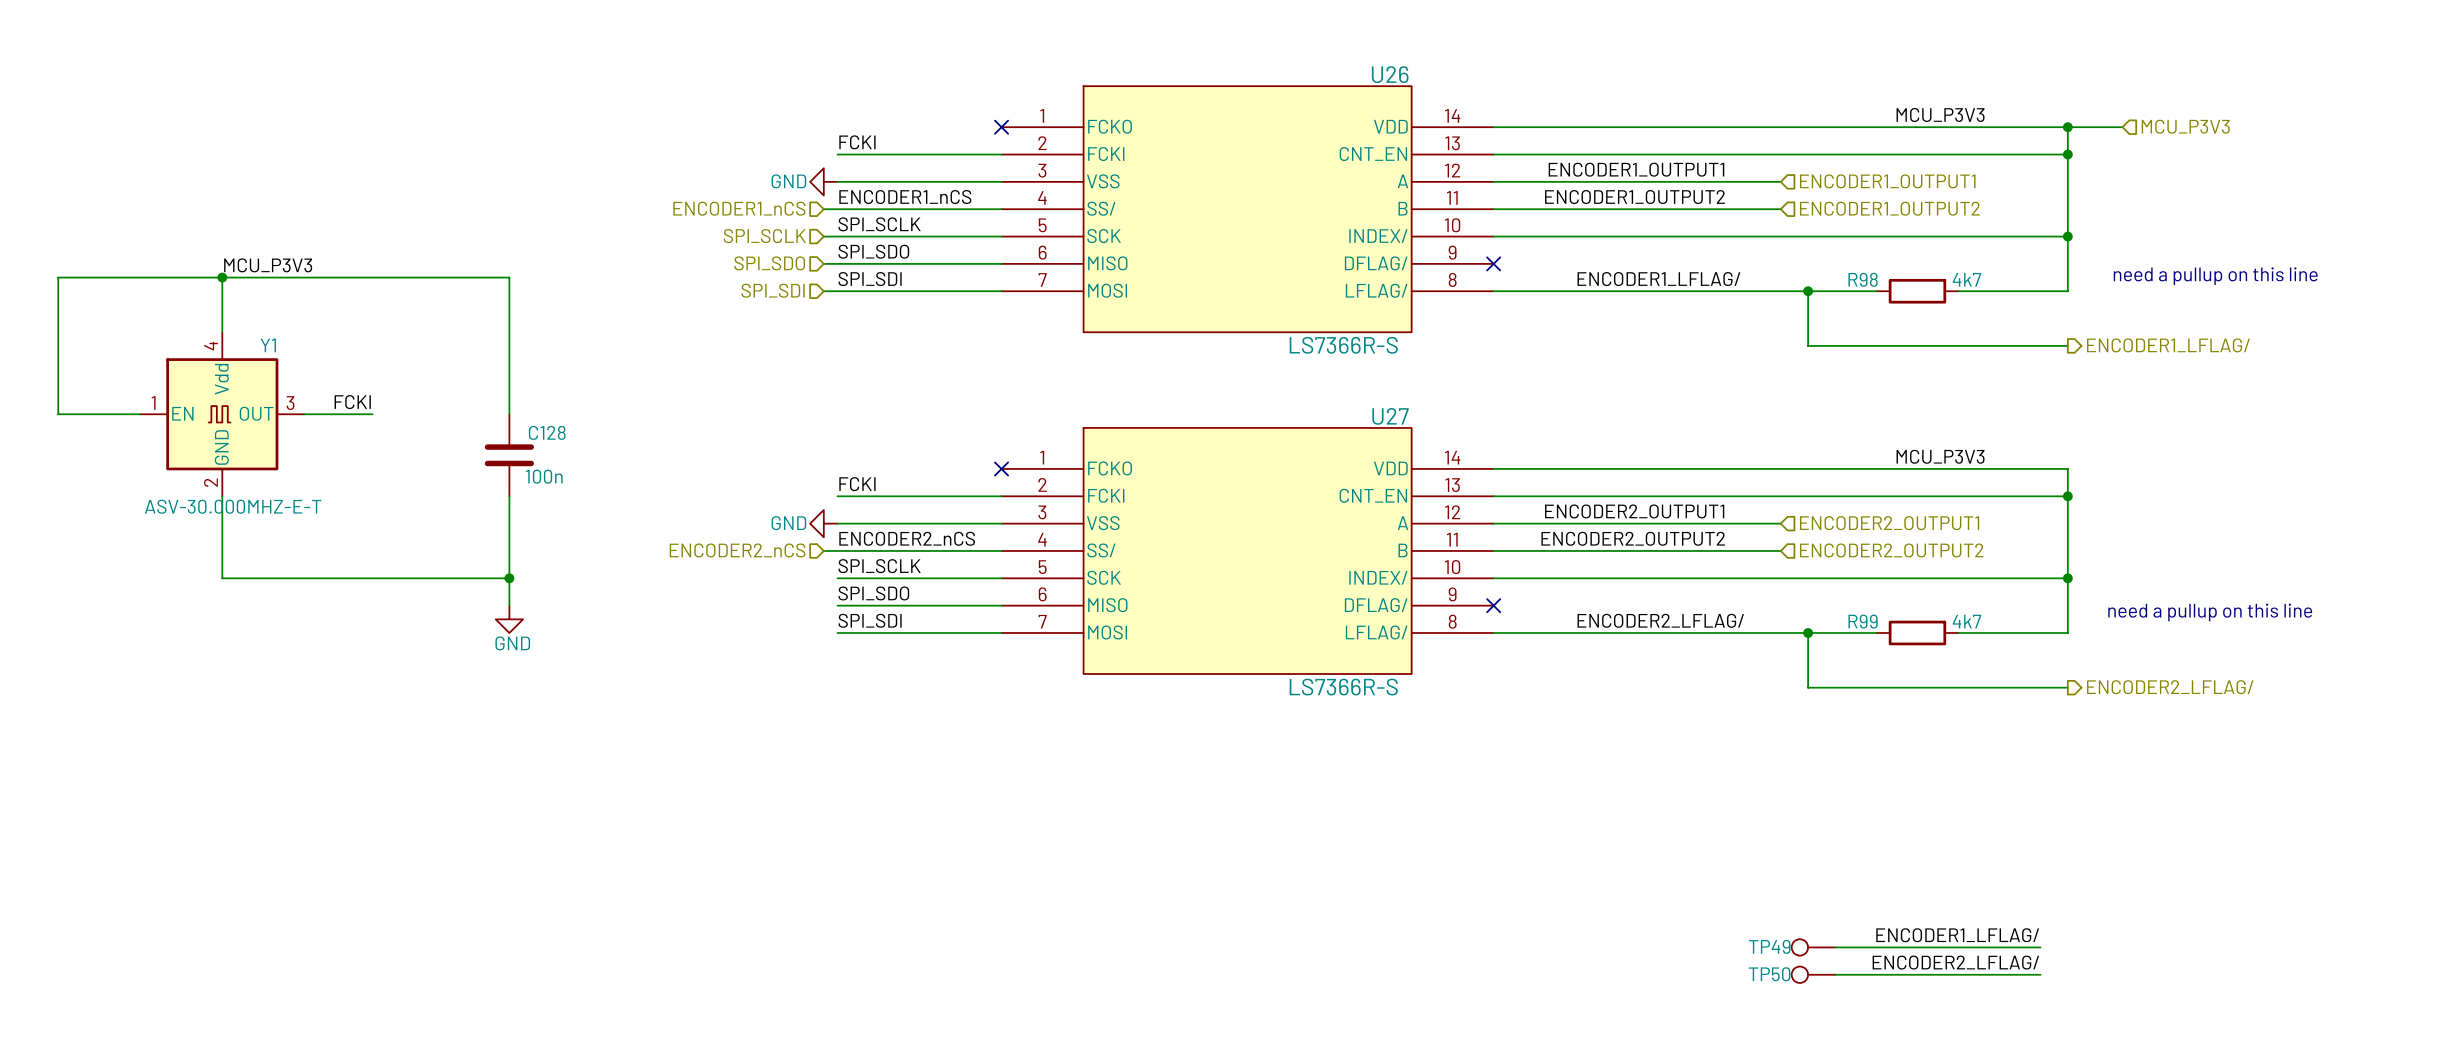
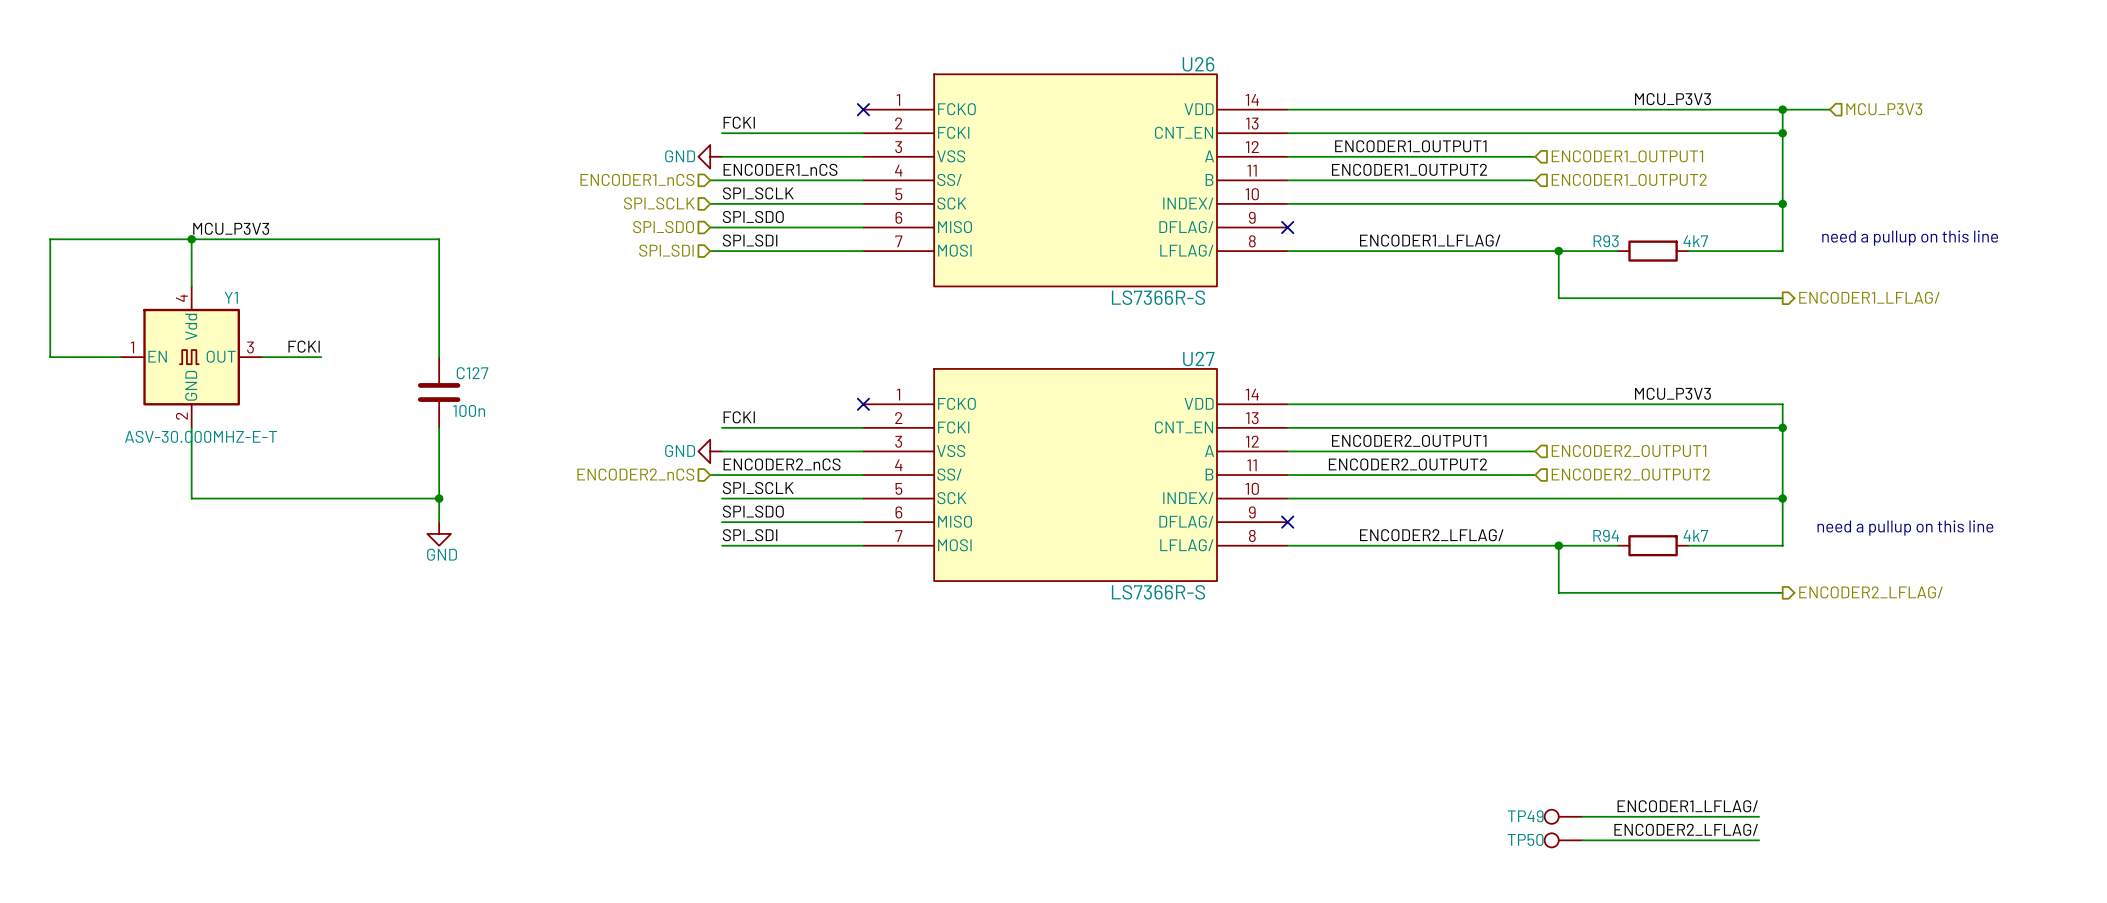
R98 name: R98 (1863, 279) -> R93 (1606, 241)
C128 name: C128 (547, 432) -> C127 (472, 373)
R99 name: R99 (1863, 621) -> R94 (1606, 535)

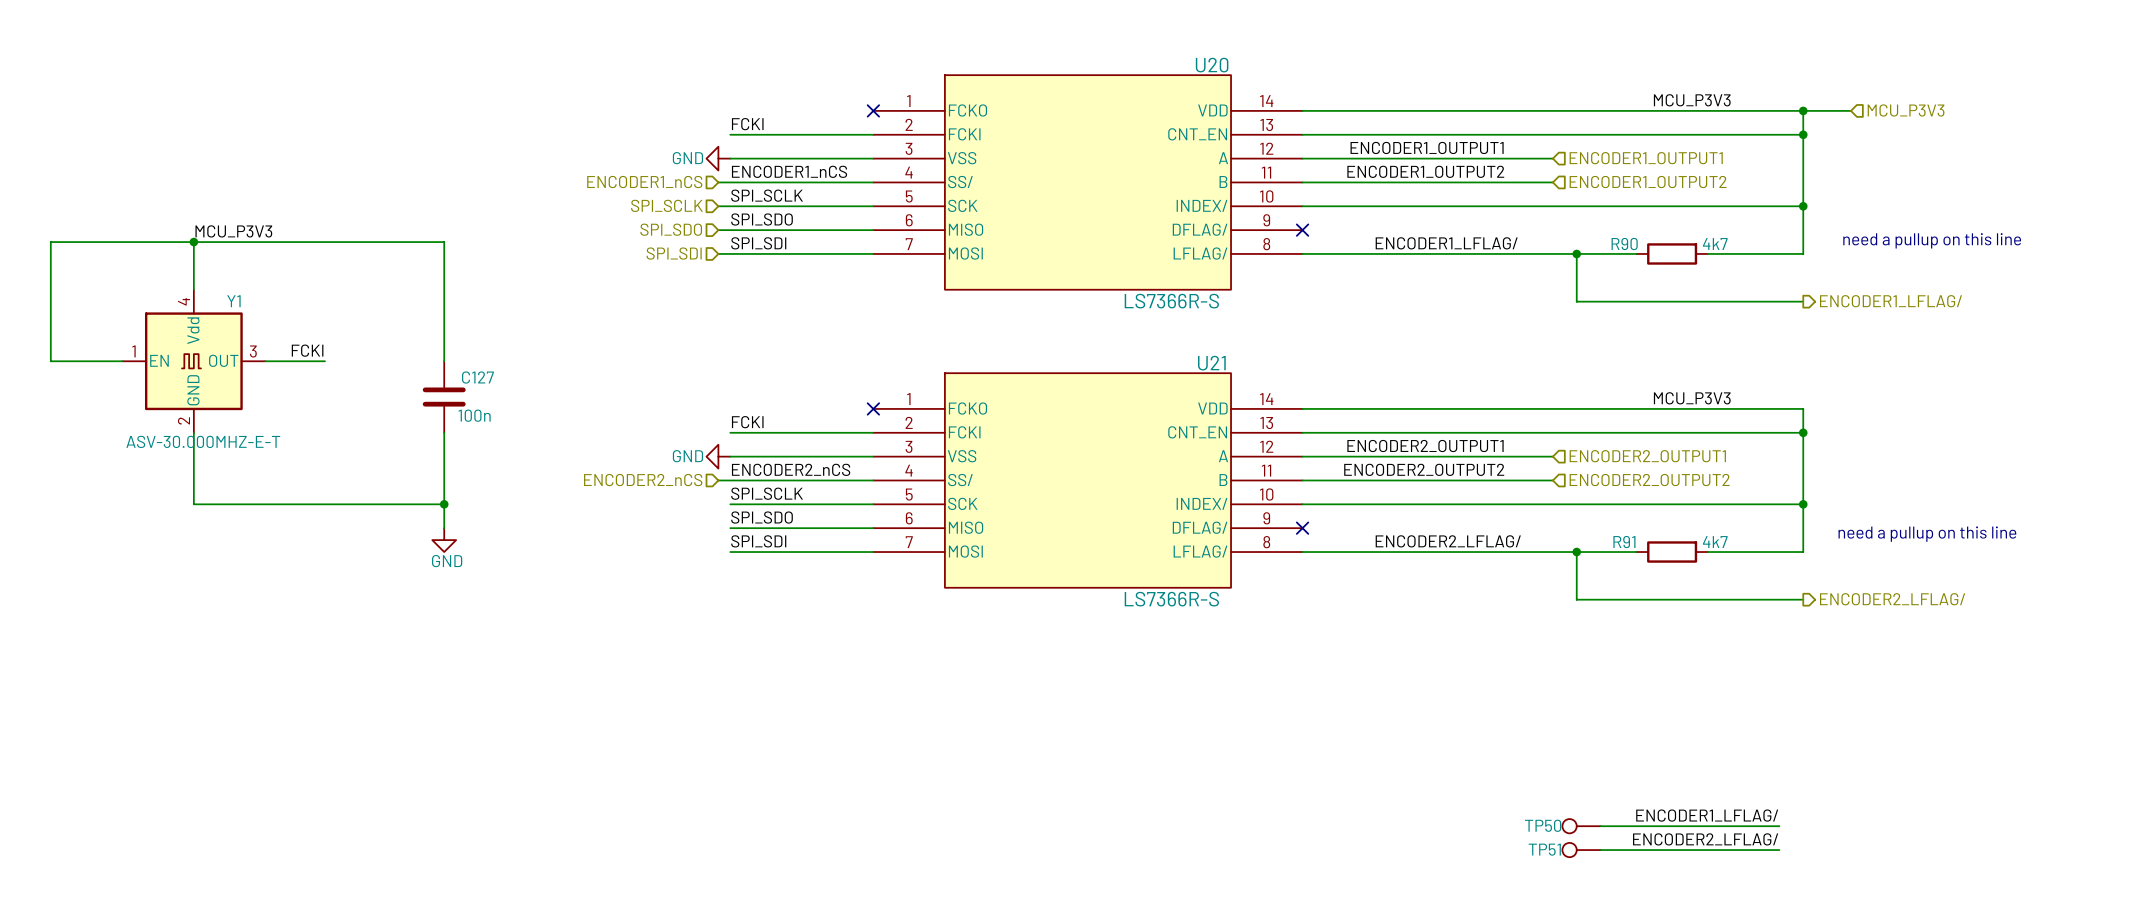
U26 name: U26 (1198, 64) -> U20 (1212, 65)
R93 name: R93 (1606, 241) -> R90 (1624, 244)
U27 name: U27 (1198, 358) -> U21 (1211, 363)
R94 name: R94 (1606, 535) -> R91 (1624, 542)
TP49 name: TP49 (1525, 816) -> TP50 (1543, 825)
TP50 name: TP50 (1525, 839) -> TP51 (1544, 849)

